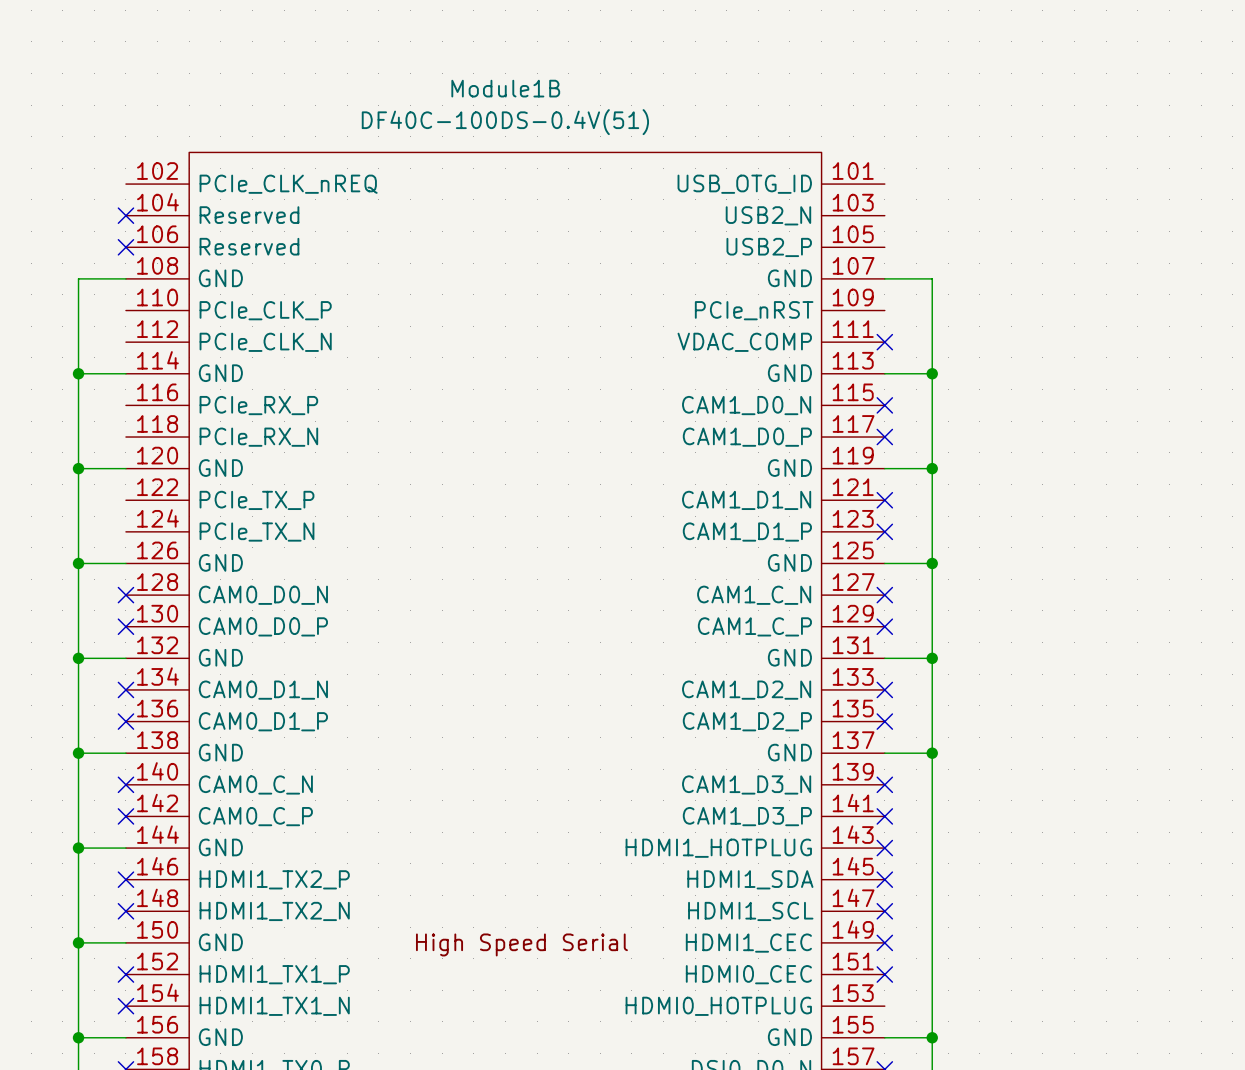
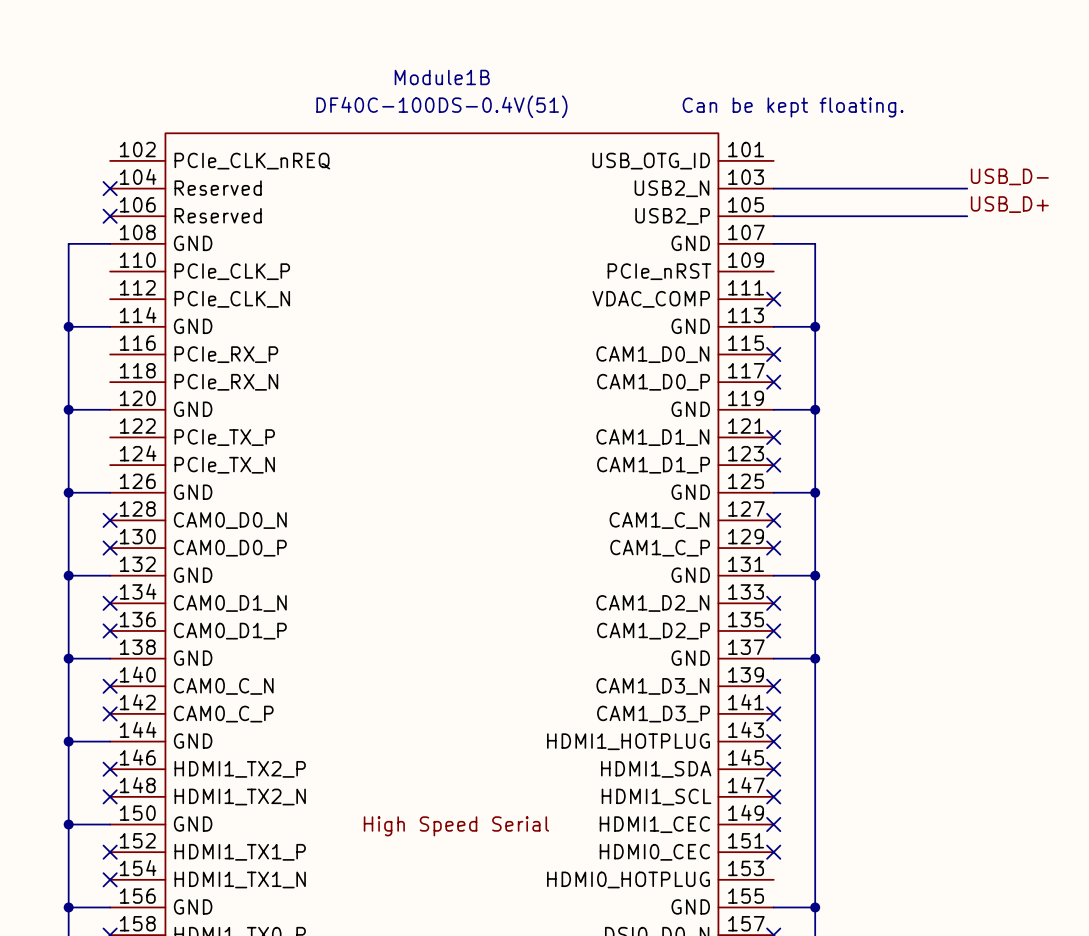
text: none -> Can be kept floating. (793, 107)
label: none -> USB_D- (1009, 176)
wire: none -> (773, 188) (967, 188)
label: none -> USB_D+ (1009, 204)
wire: none -> (773, 216) (967, 216)

